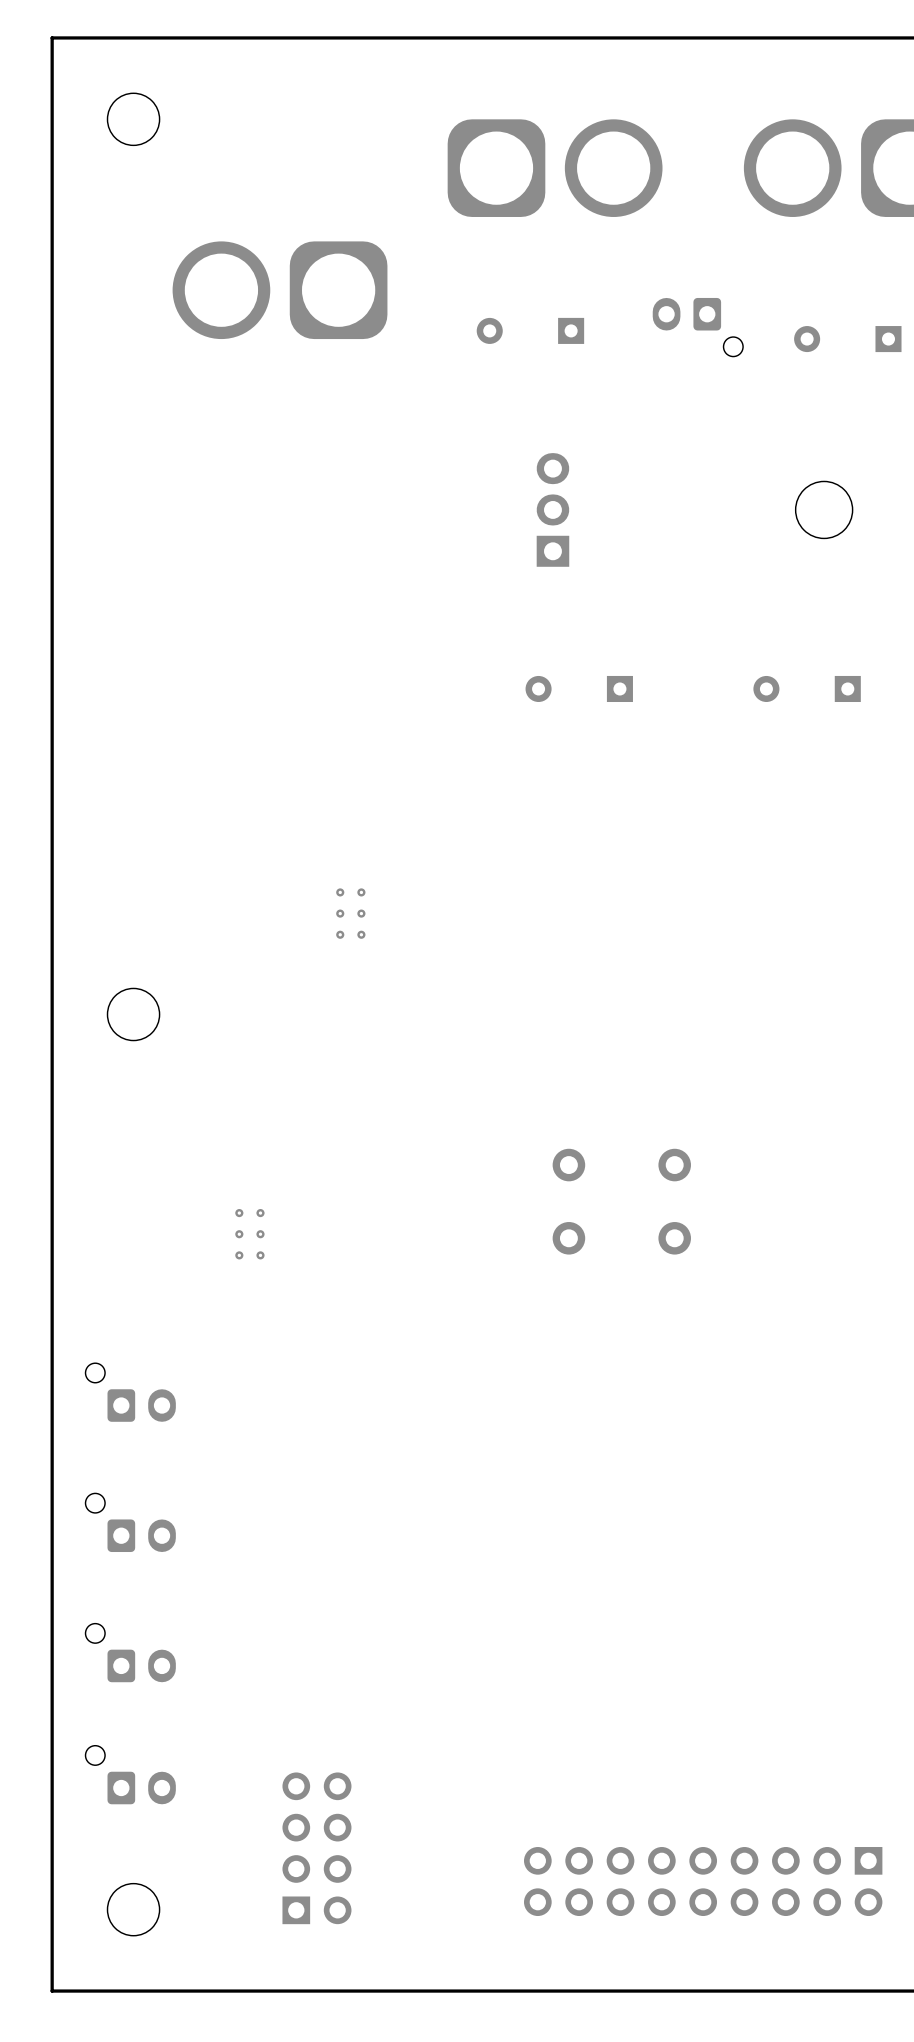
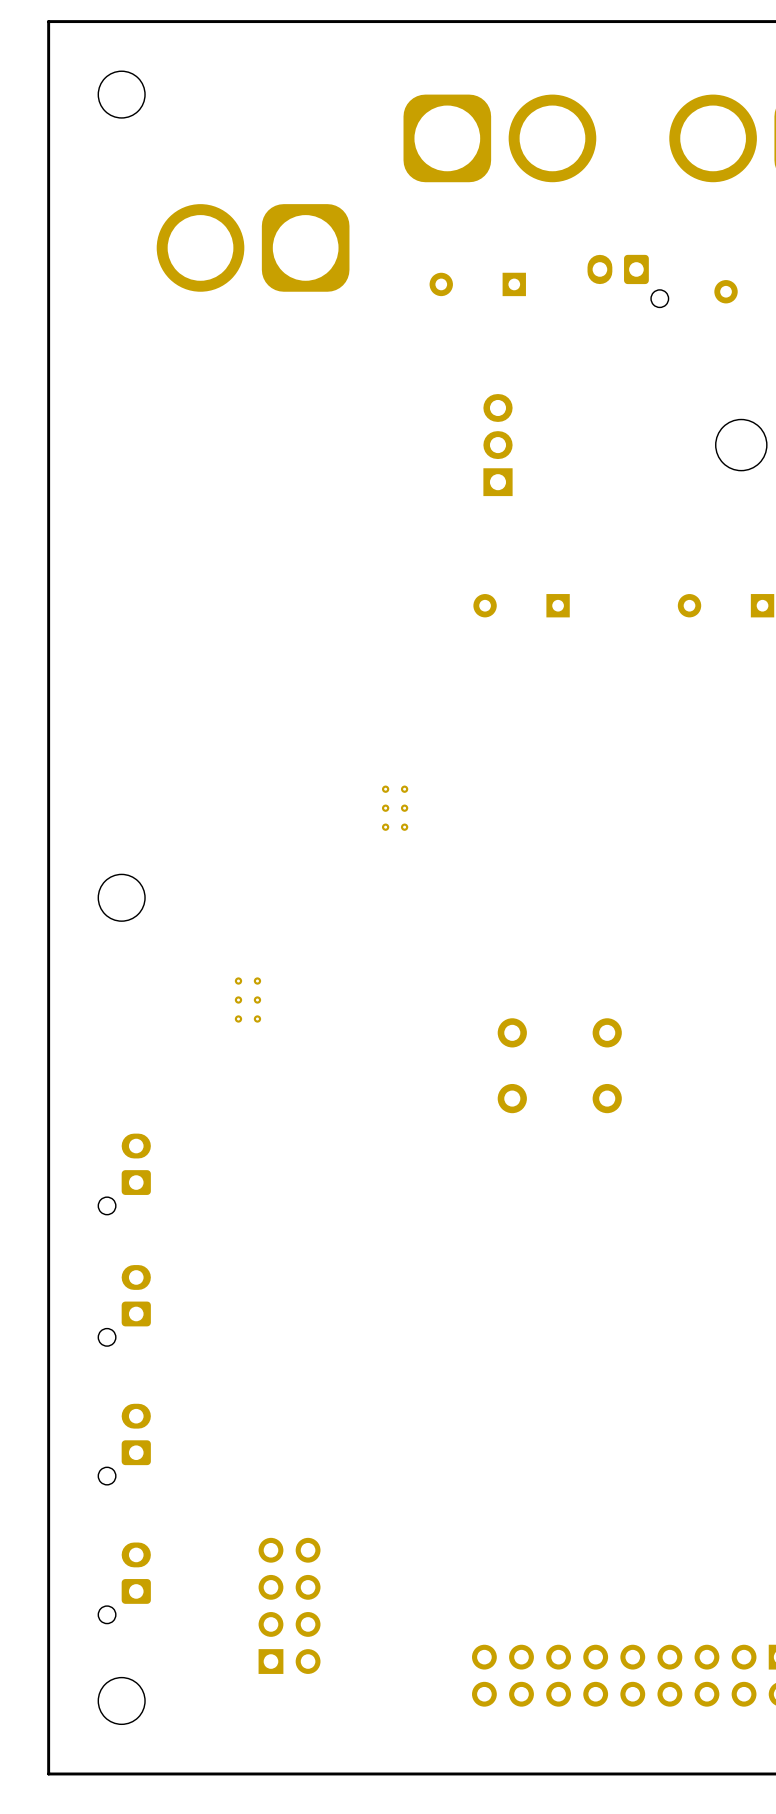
part position: (350, 913) -> (395, 808)
part position: (249, 1234) -> (247, 1000)
part: none -> (124, 1174)
part: (130, 1392) -> none
part: none -> (124, 1305)
part: (130, 1522) -> none
part rotation: 0° (130, 1652) -> 90° counterclockwise (124, 1444)
part rotation: 0° (130, 1774) -> 90° counterclockwise (124, 1583)
part position: (316, 1848) -> (289, 1605)

